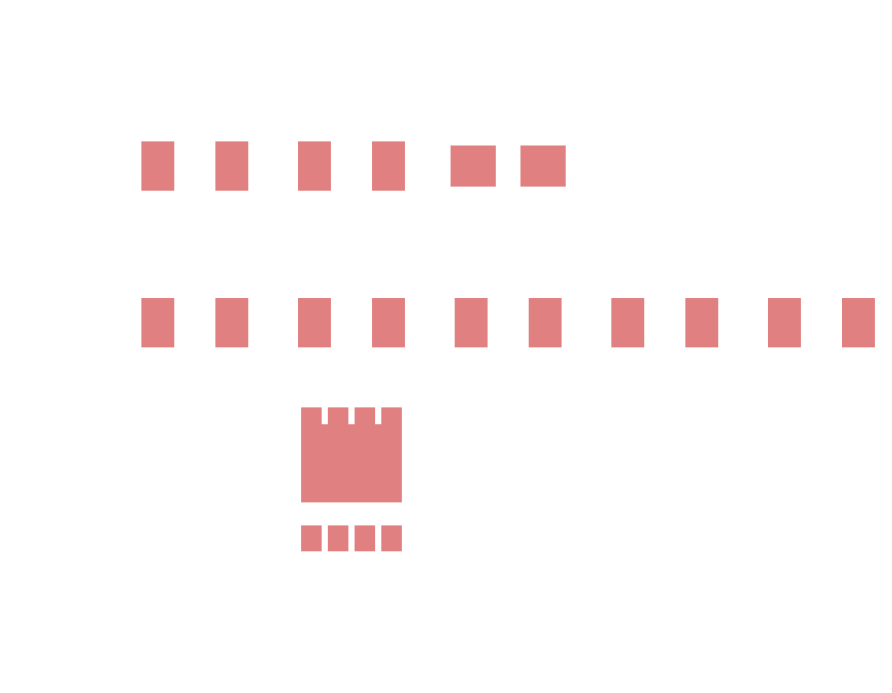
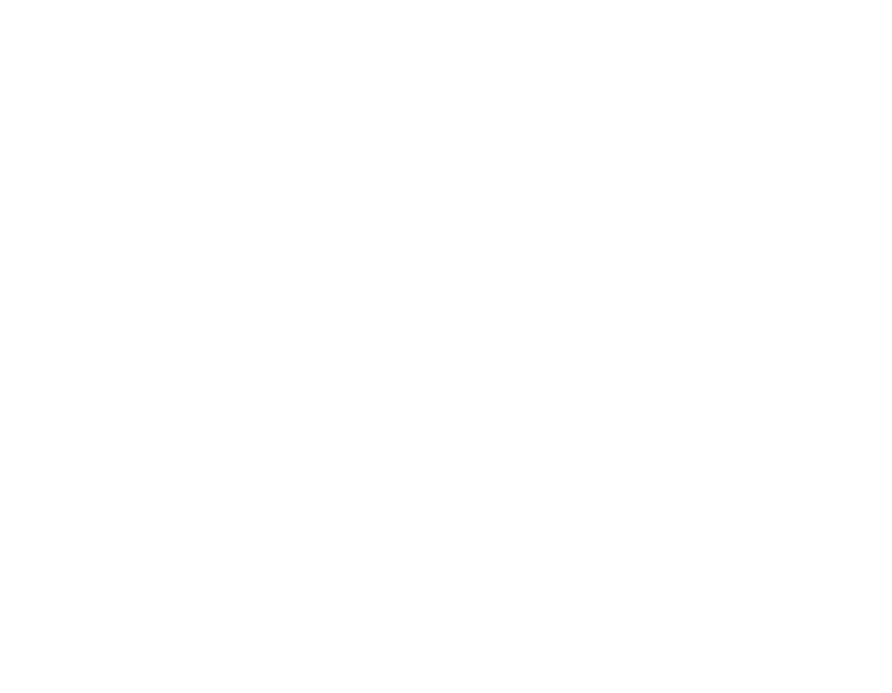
part: (194, 166) -> none
part: (351, 166) -> none
part: (508, 166) -> none
part: (194, 322) -> none
part: (351, 322) -> none
part: (508, 322) -> none
part: (664, 322) -> none
part: (821, 322) -> none
part: (351, 479) -> none

